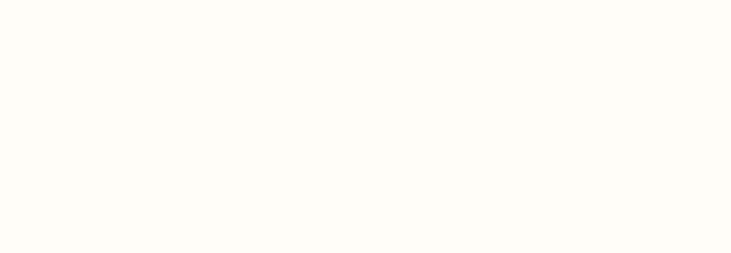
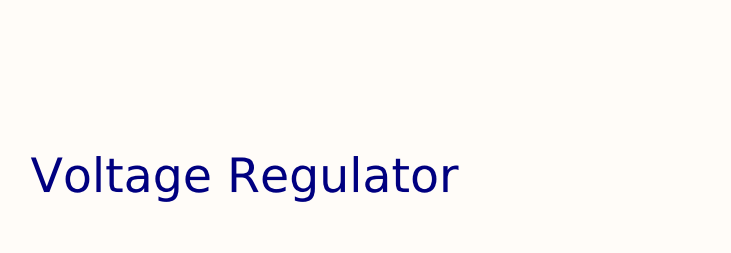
text: none -> Voltage Regulator (244, 178)

